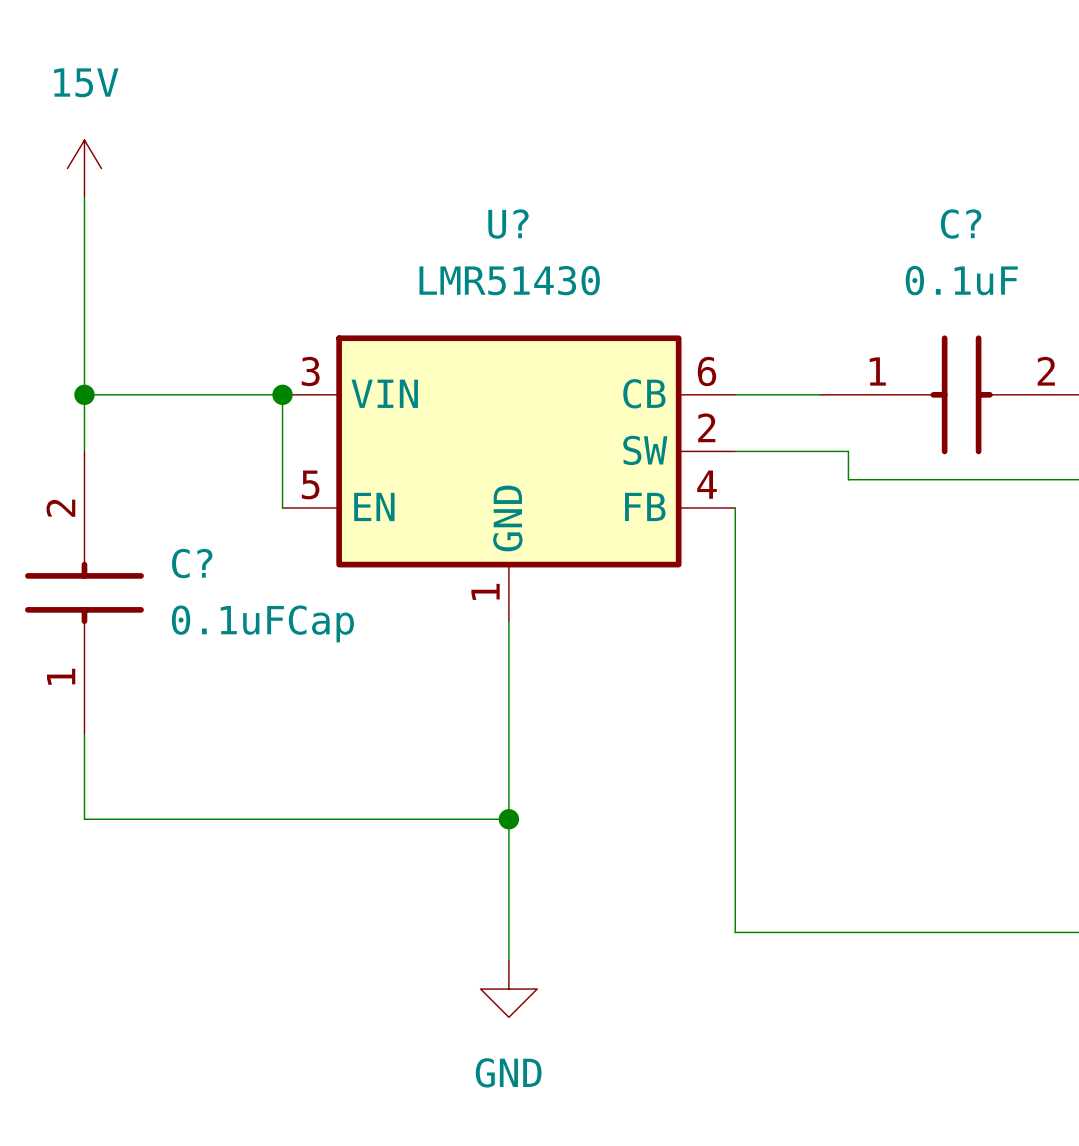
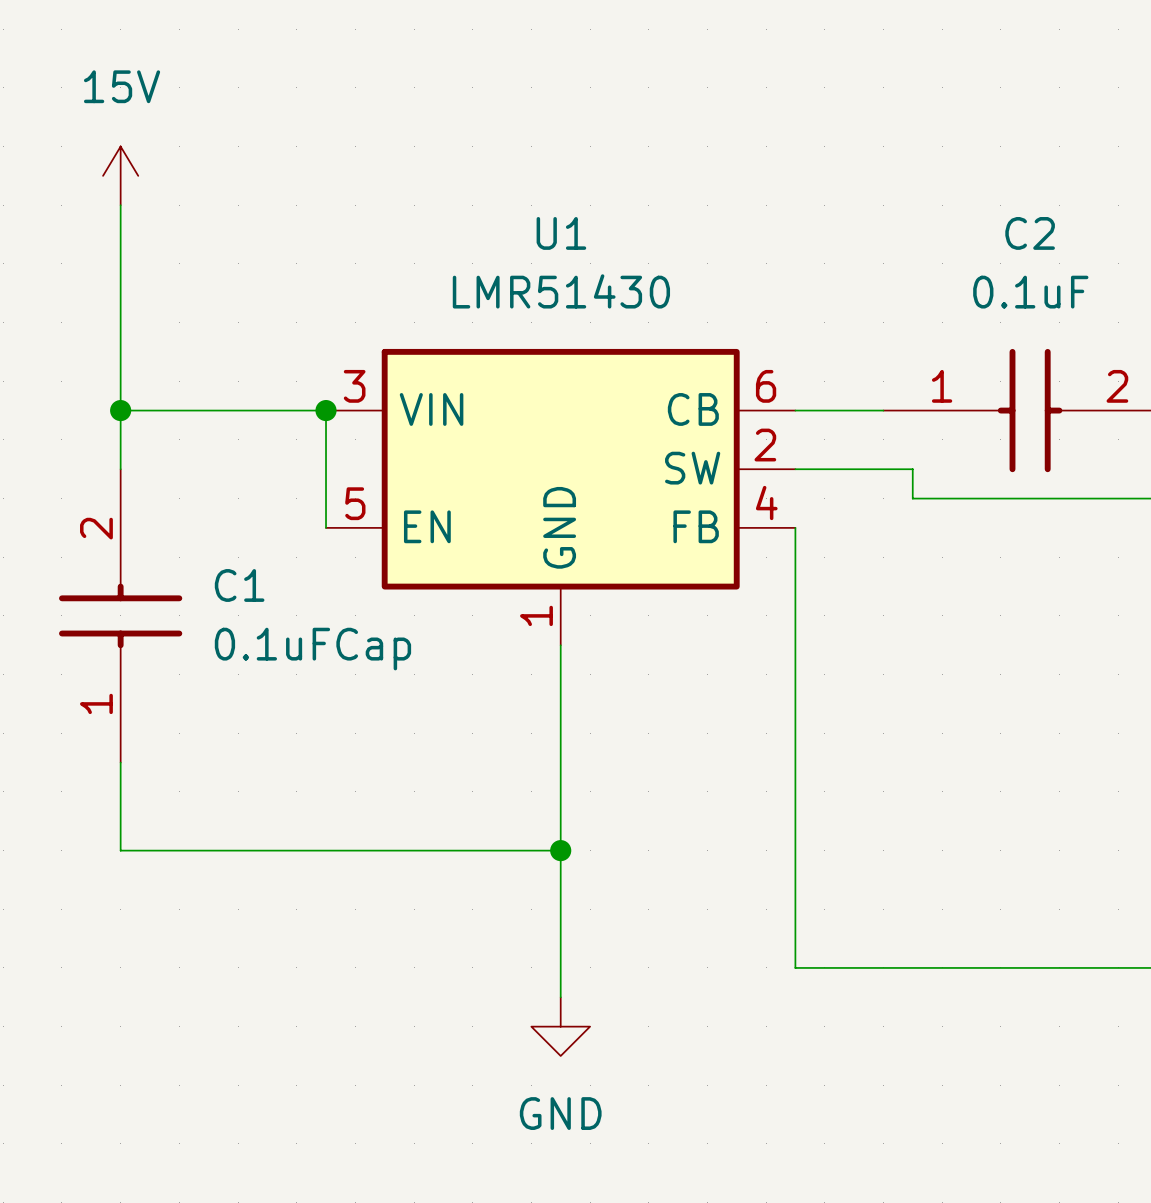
U? name: U? (508, 224) -> U1 (561, 233)
C? name: C? (961, 224) -> C2 (1030, 233)
C? name: C? (192, 563) -> C1 (239, 585)

